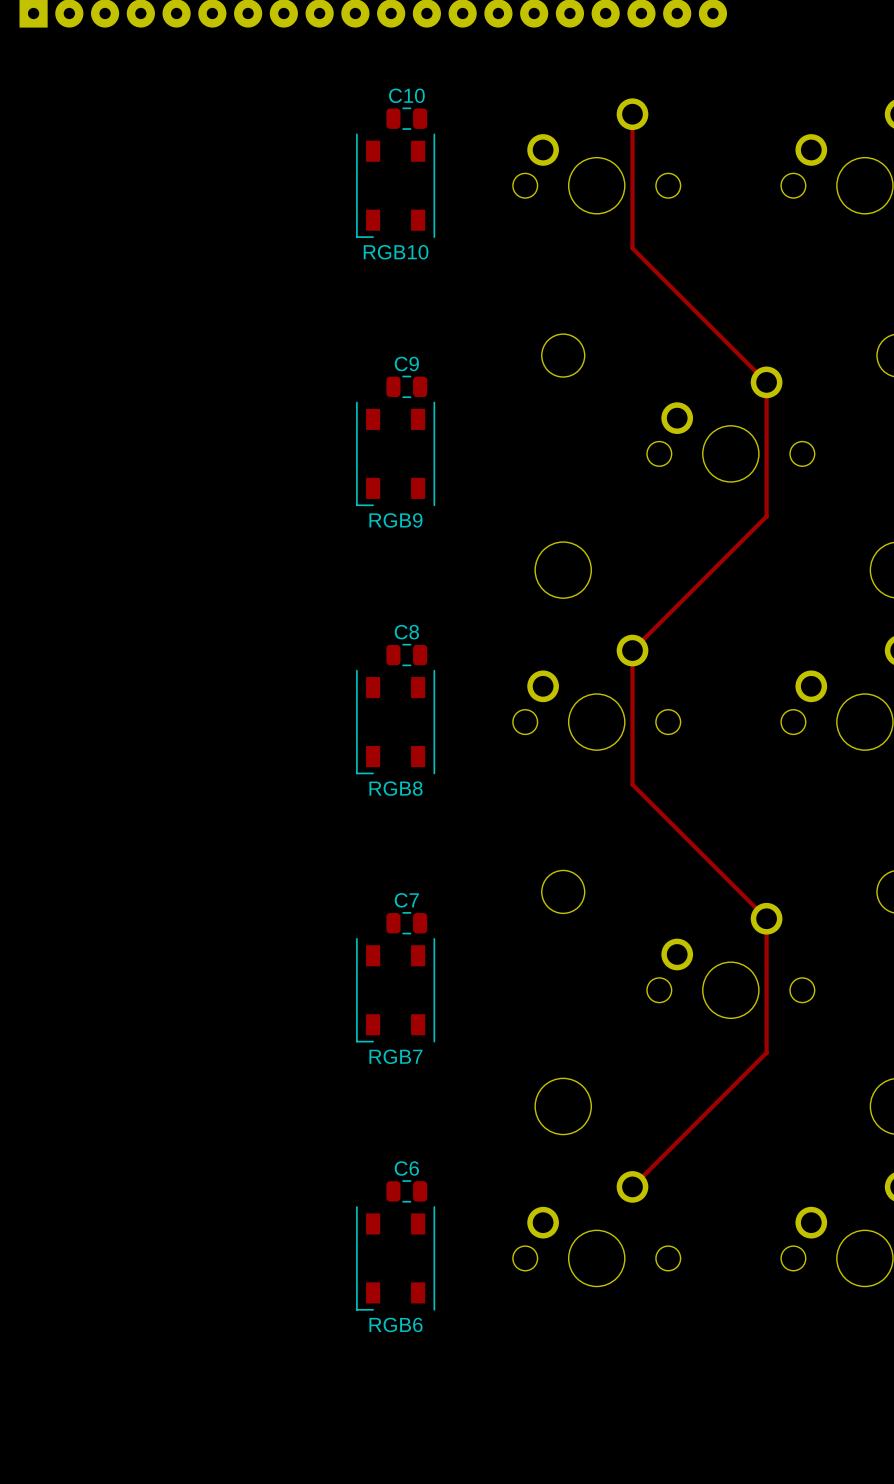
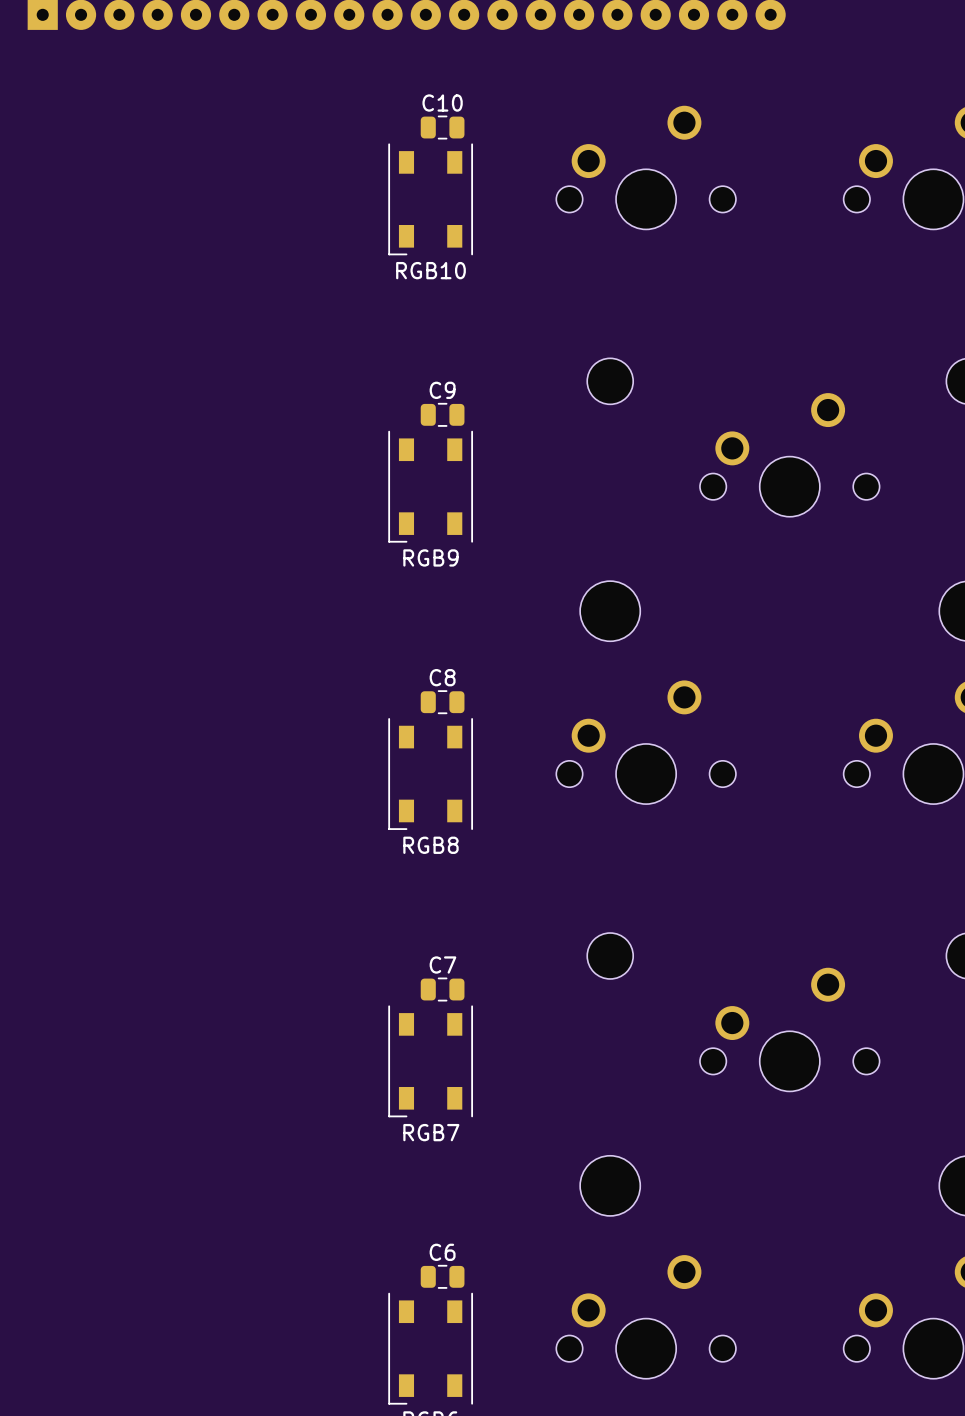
track: (632, 114) (632, 248) (766, 382) (766, 516) (632, 650) (632, 784) (766, 918) (766, 1052) (632, 1186) -> none

